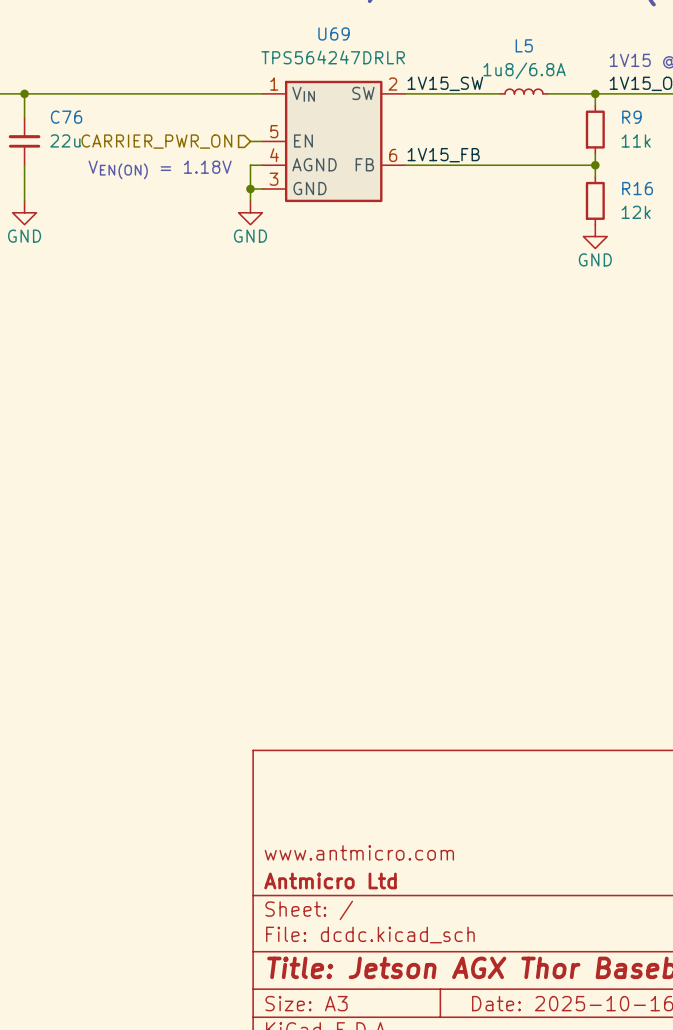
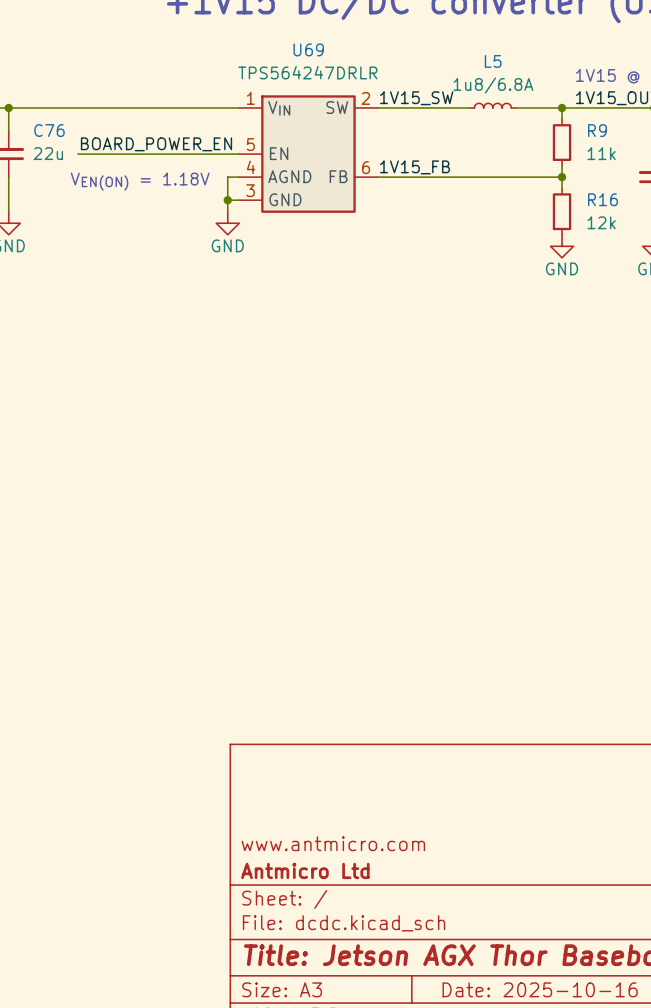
label: none -> BOARD_POWER_EN (156, 144)
wire: none -> (77, 154) (227, 154)
hierarchical label: CARRIER_PWR_ON (156, 141) -> none

